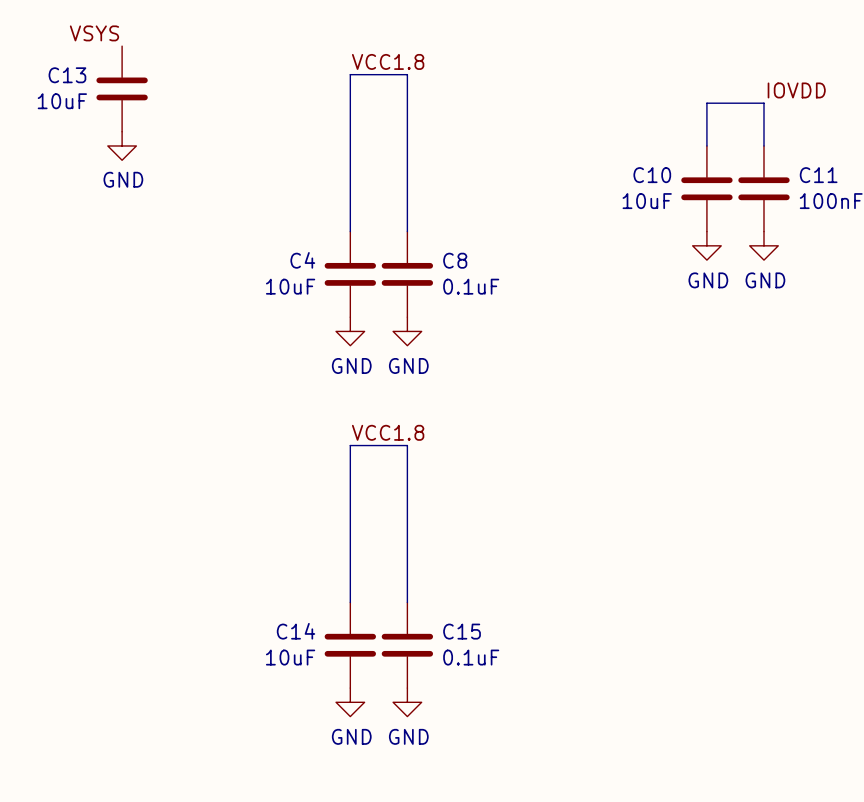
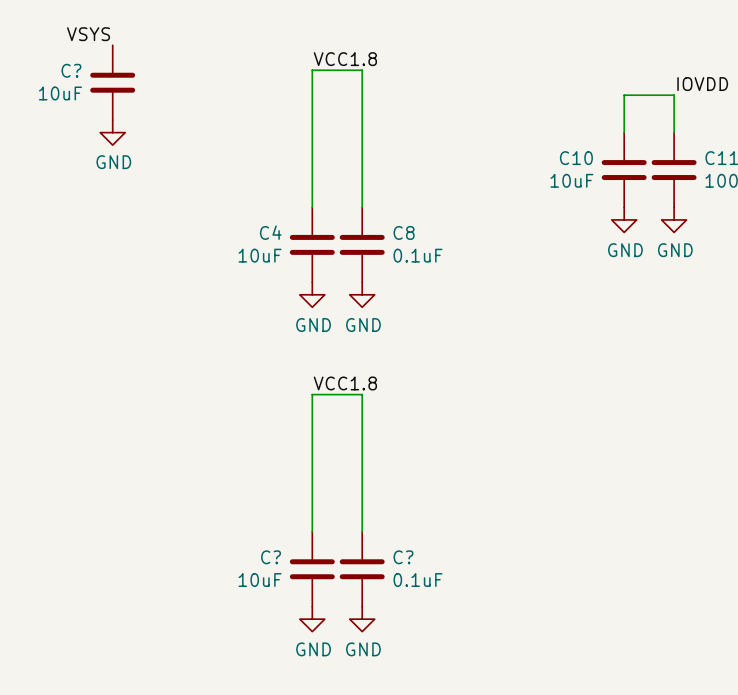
C13 name: C13 (67, 75) -> C? (71, 70)
C14 name: C14 (296, 631) -> C? (271, 557)
C15 name: C15 (462, 631) -> C? (403, 557)

